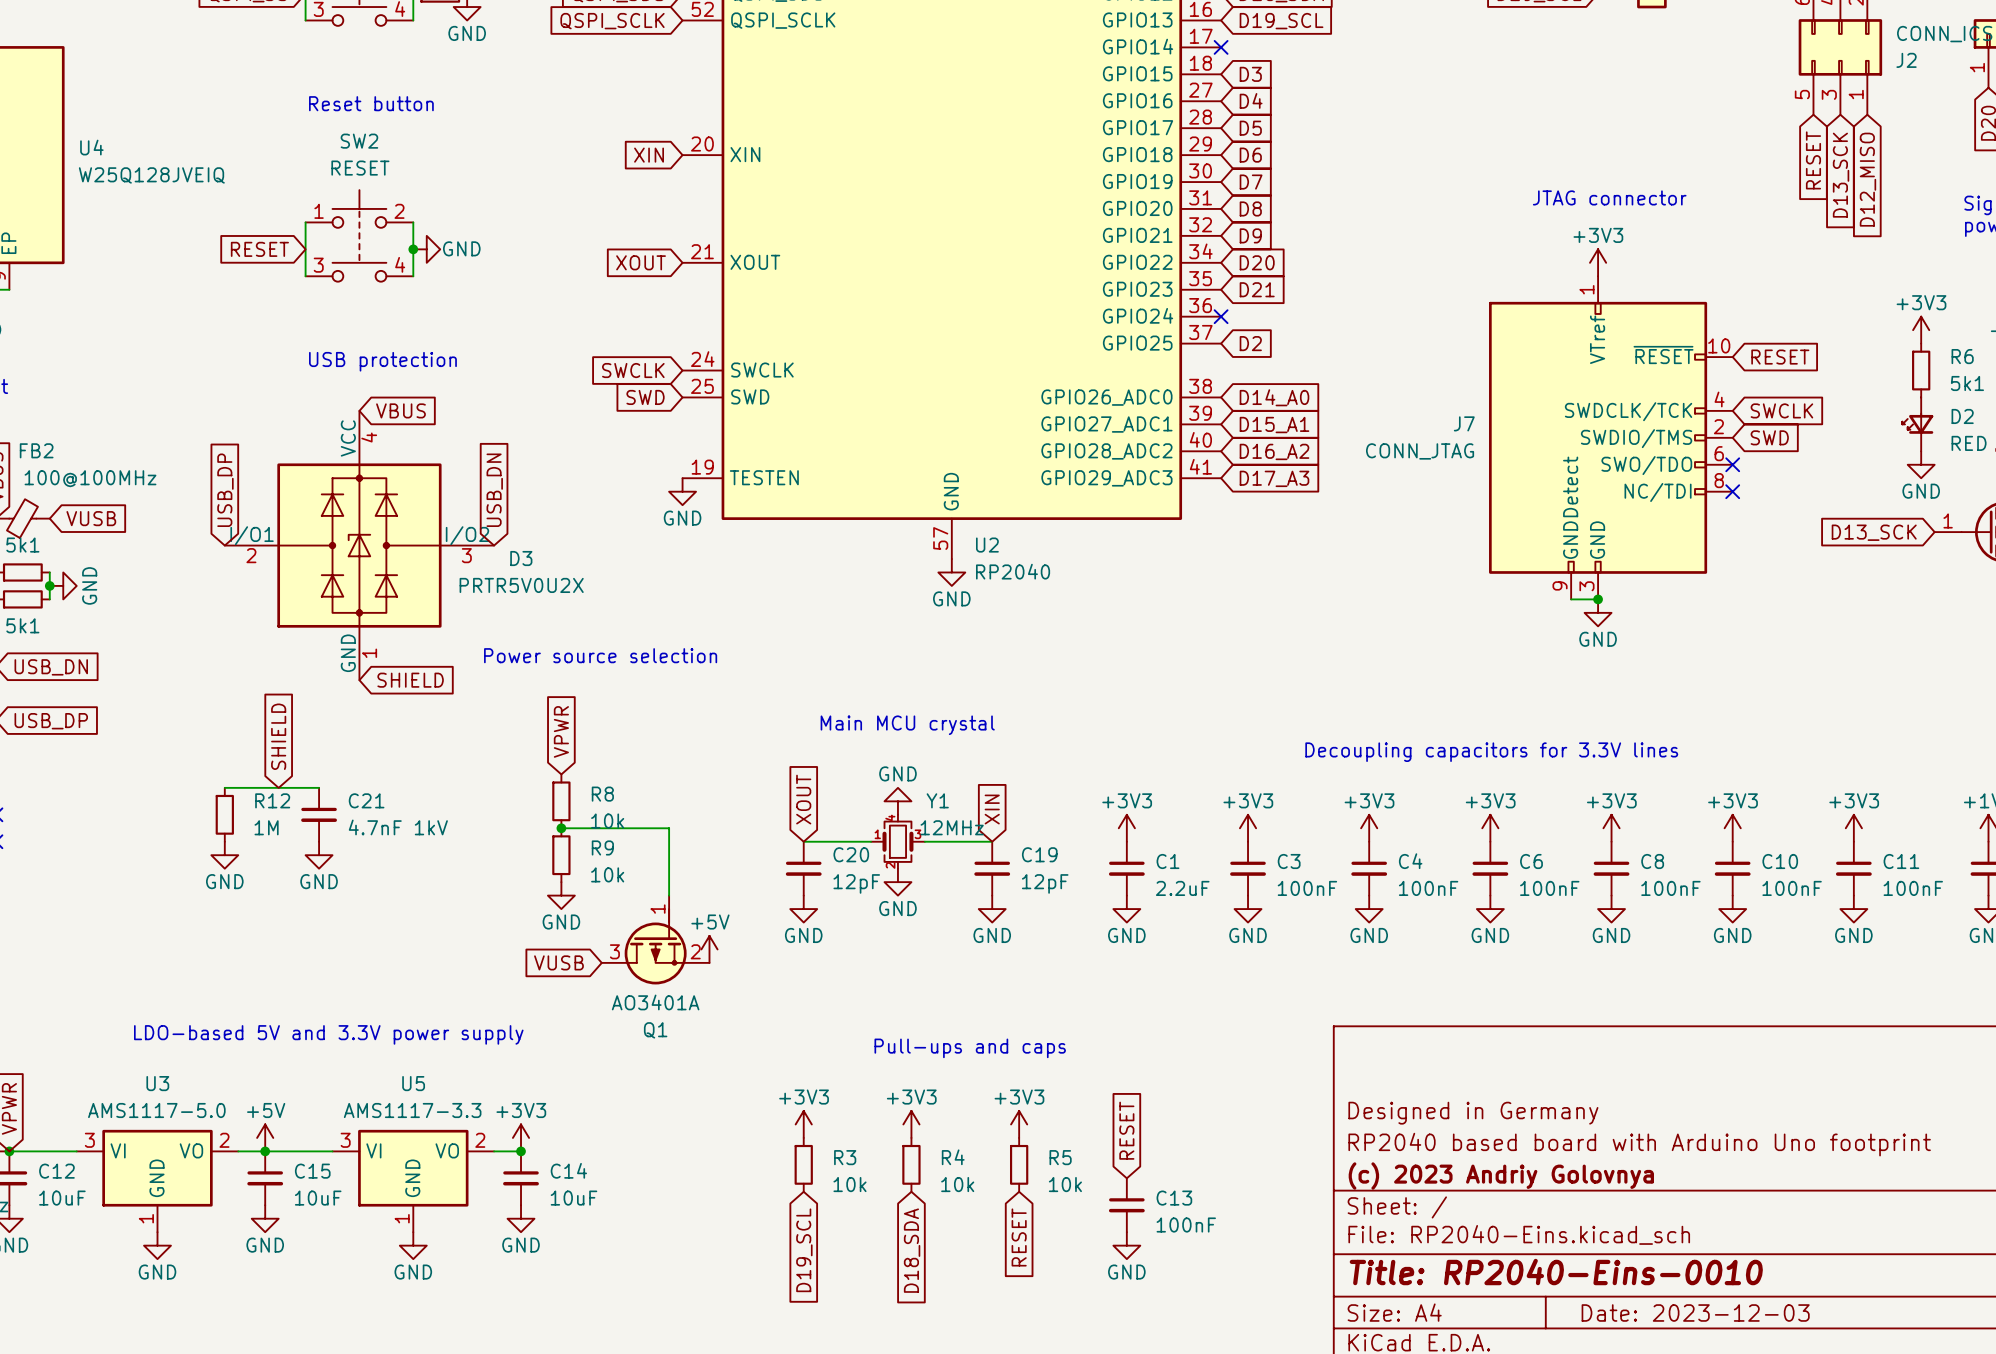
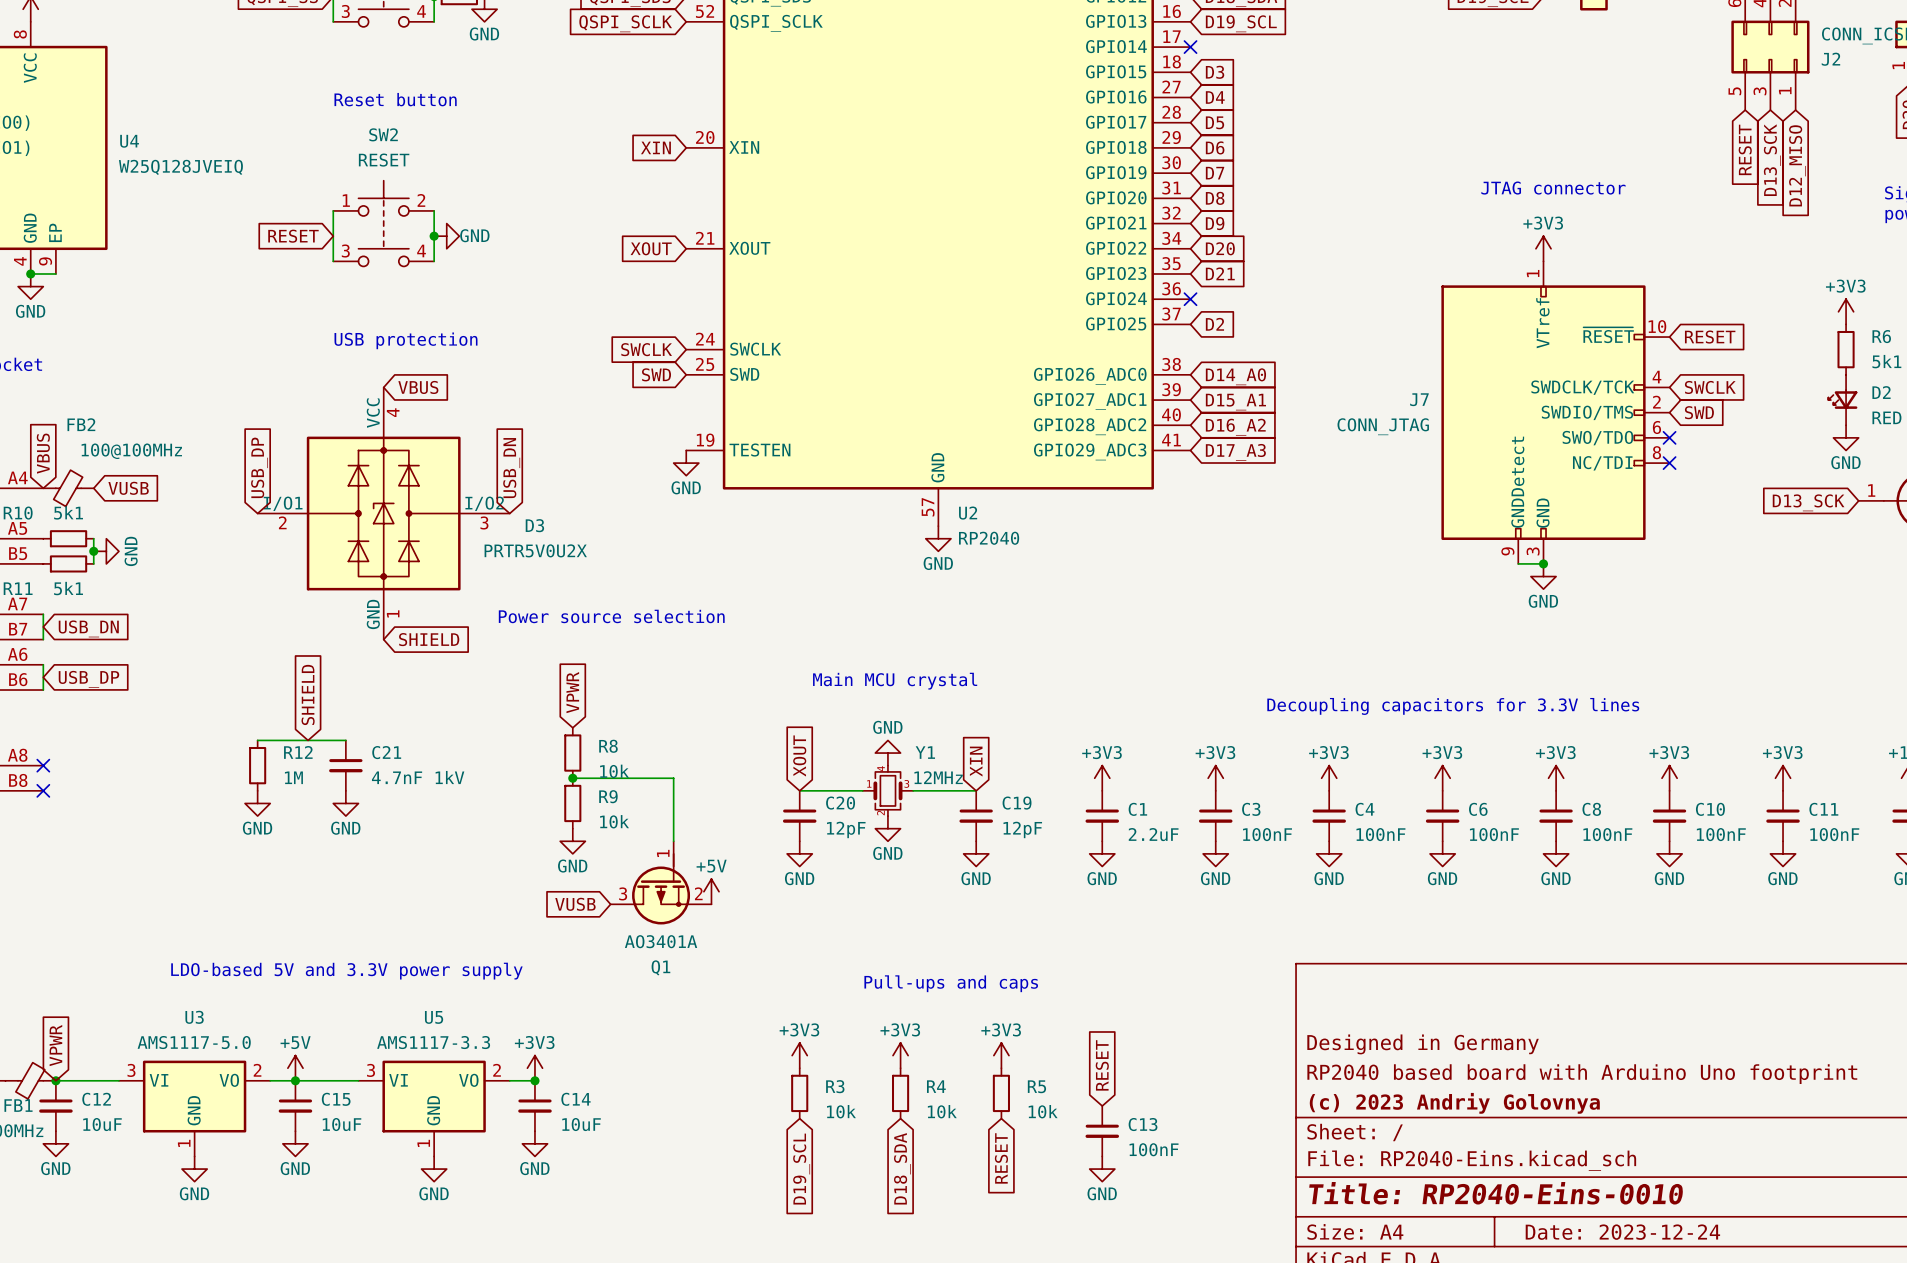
title block: Date: 2023-12-03 (1695, 1312) -> Date: 2023-12-24 (1622, 1232)

